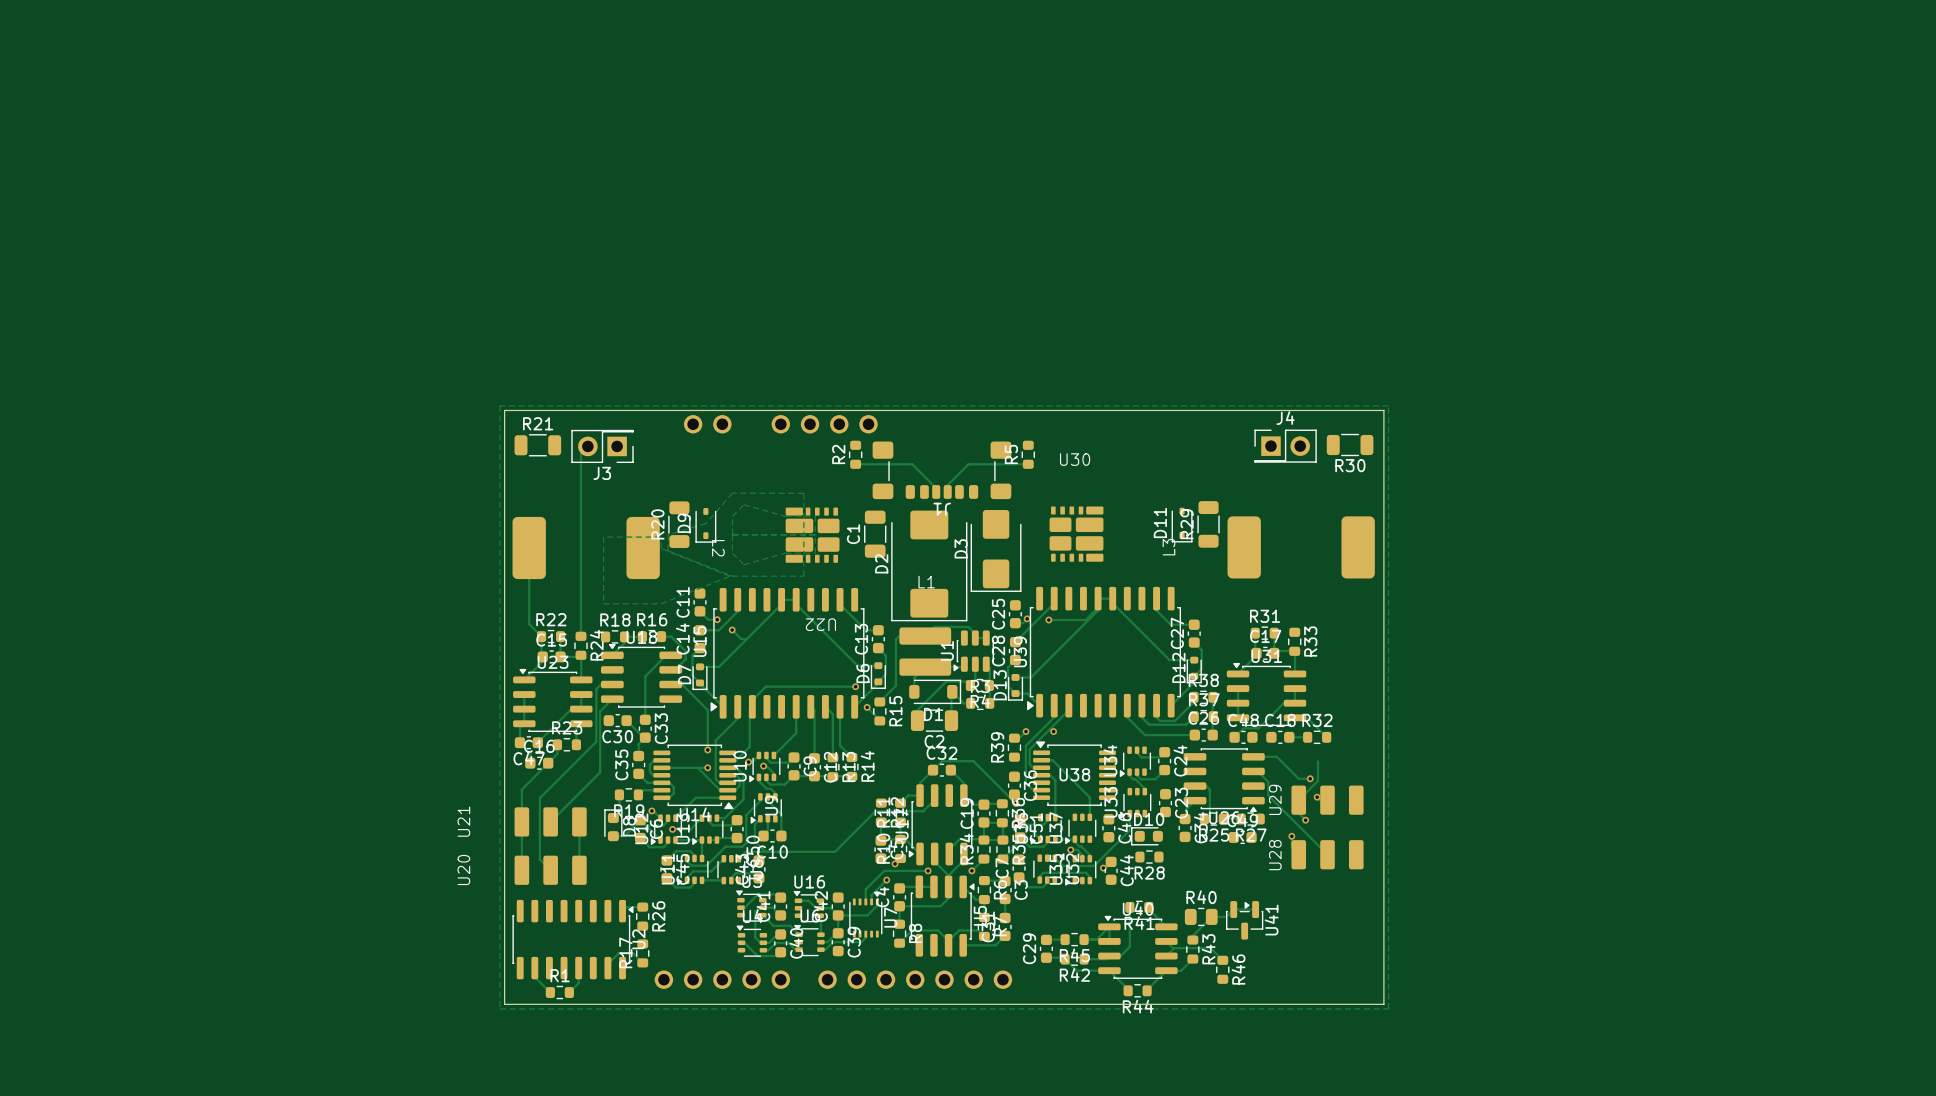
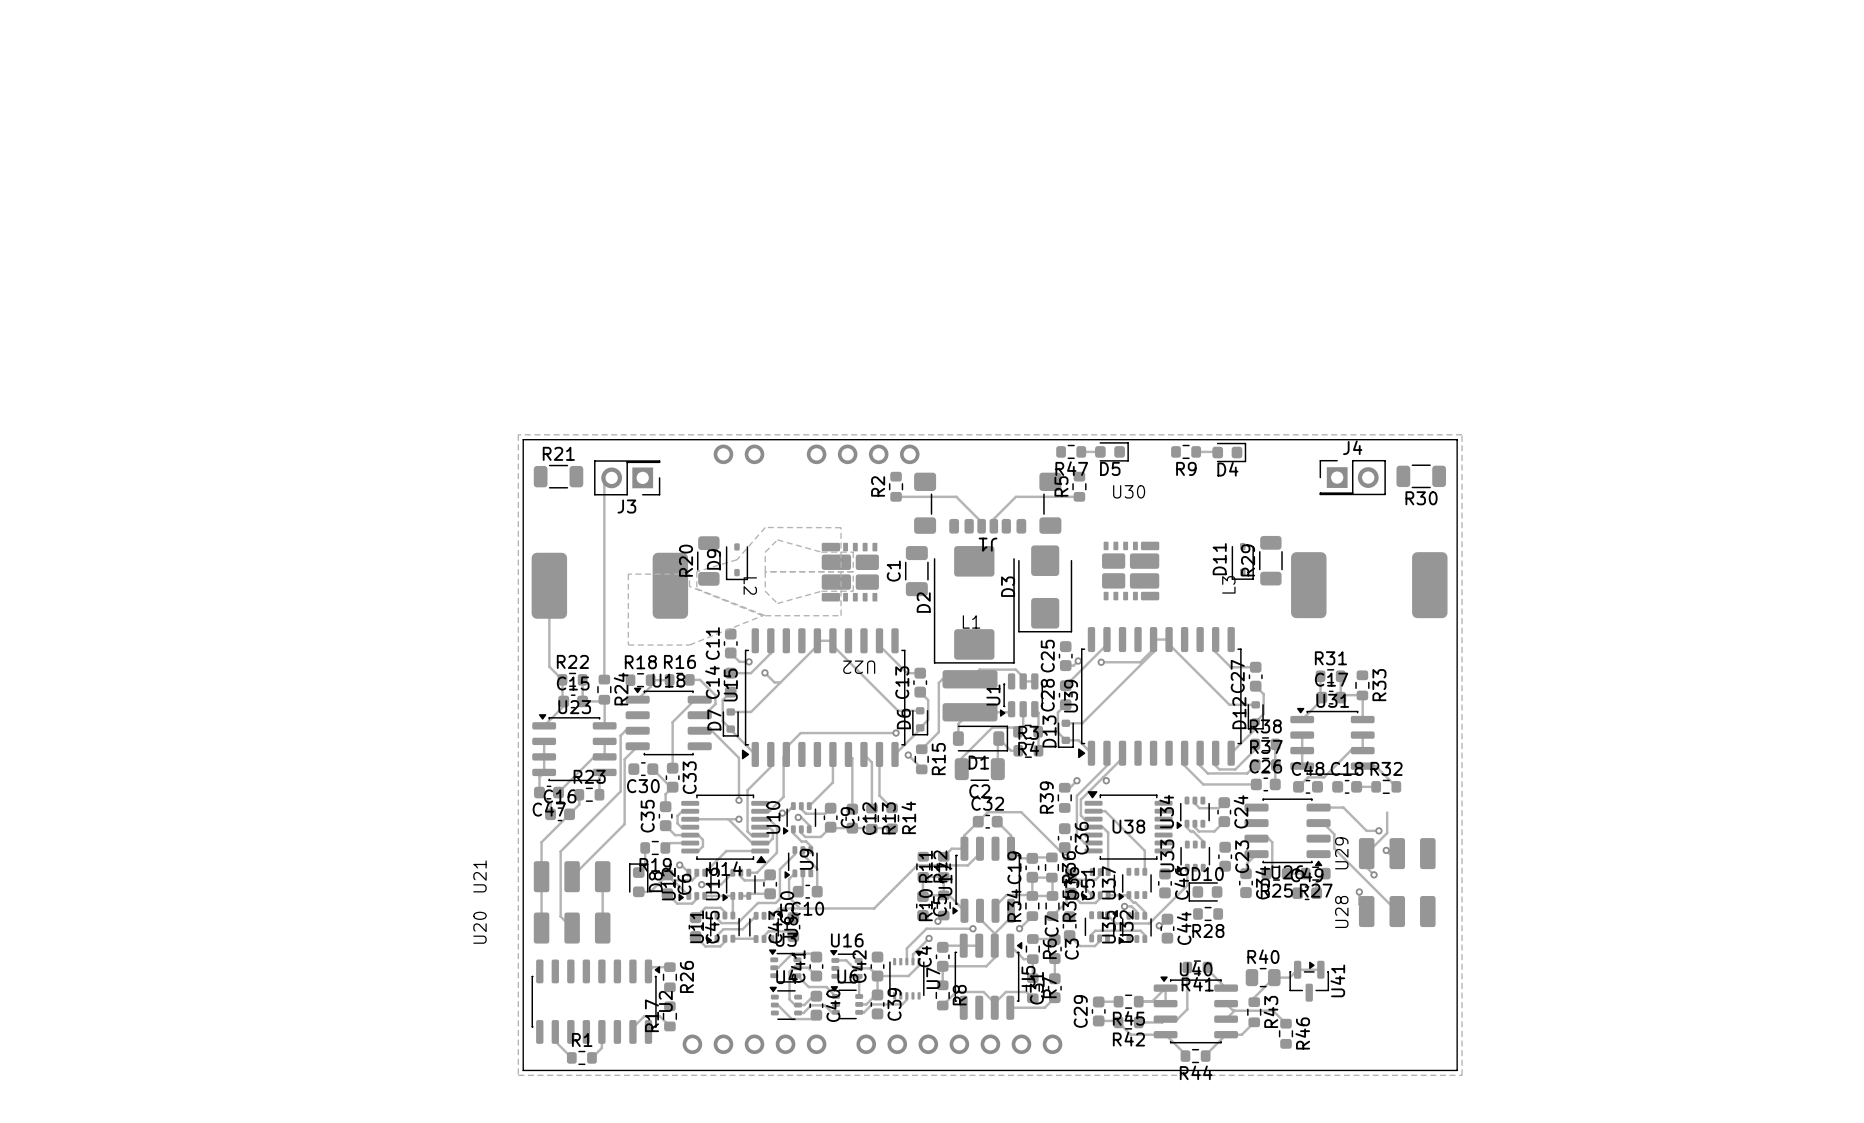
R47: none -> (1071, 451)
track: none -> (1081, 451) (1100, 451)
D5: none -> (1111, 451)
R9: none -> (1186, 451)
track: none -> (1196, 451) (1217, 452)
D4: none -> (1229, 452)

